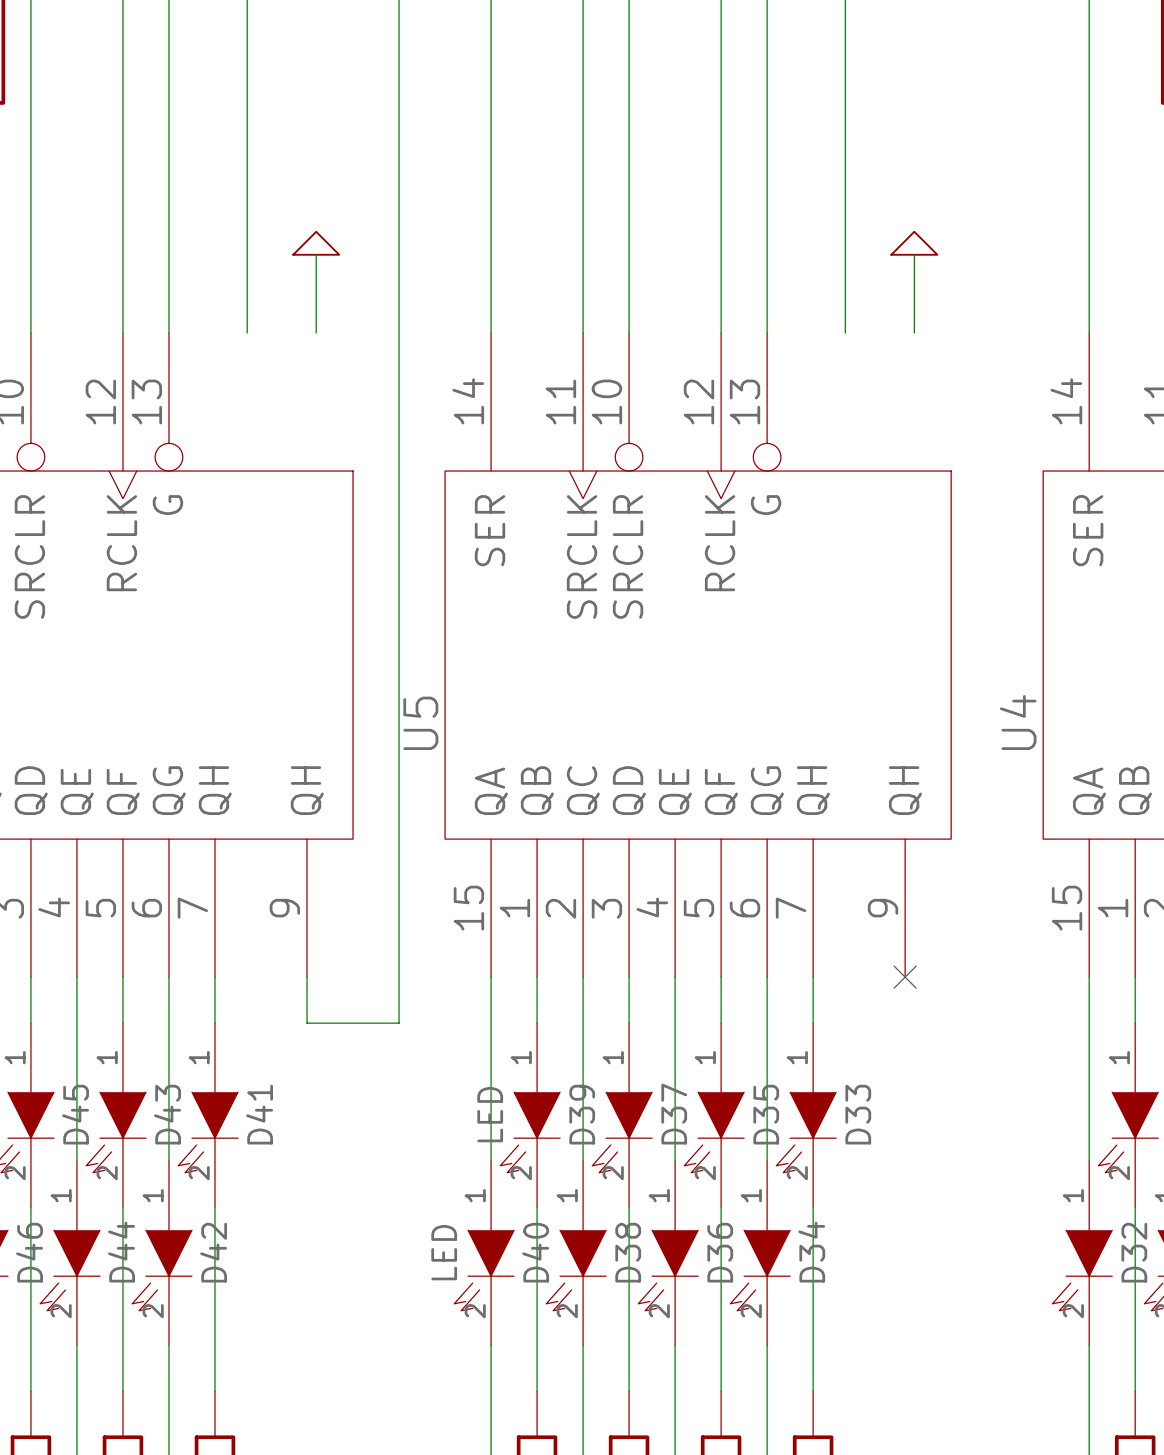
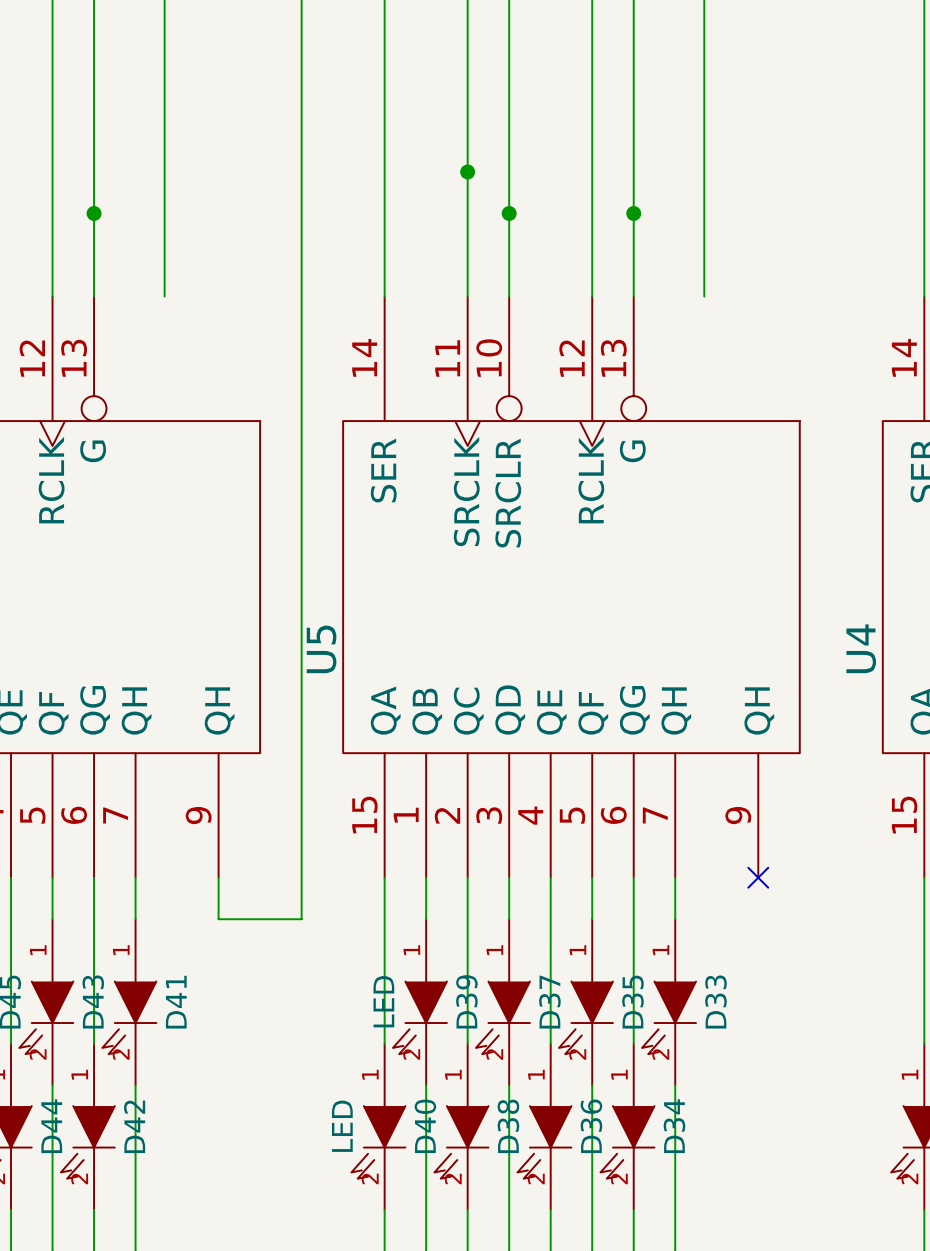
junction: none -> (467, 171)
junction: none -> (94, 213)
junction: none -> (509, 213)
junction: none -> (633, 213)
power symbol: (316, 243) -> none
power symbol: (914, 243) -> none
wire: (316, 254) (316, 332) -> none
wire: (914, 254) (914, 332) -> none

